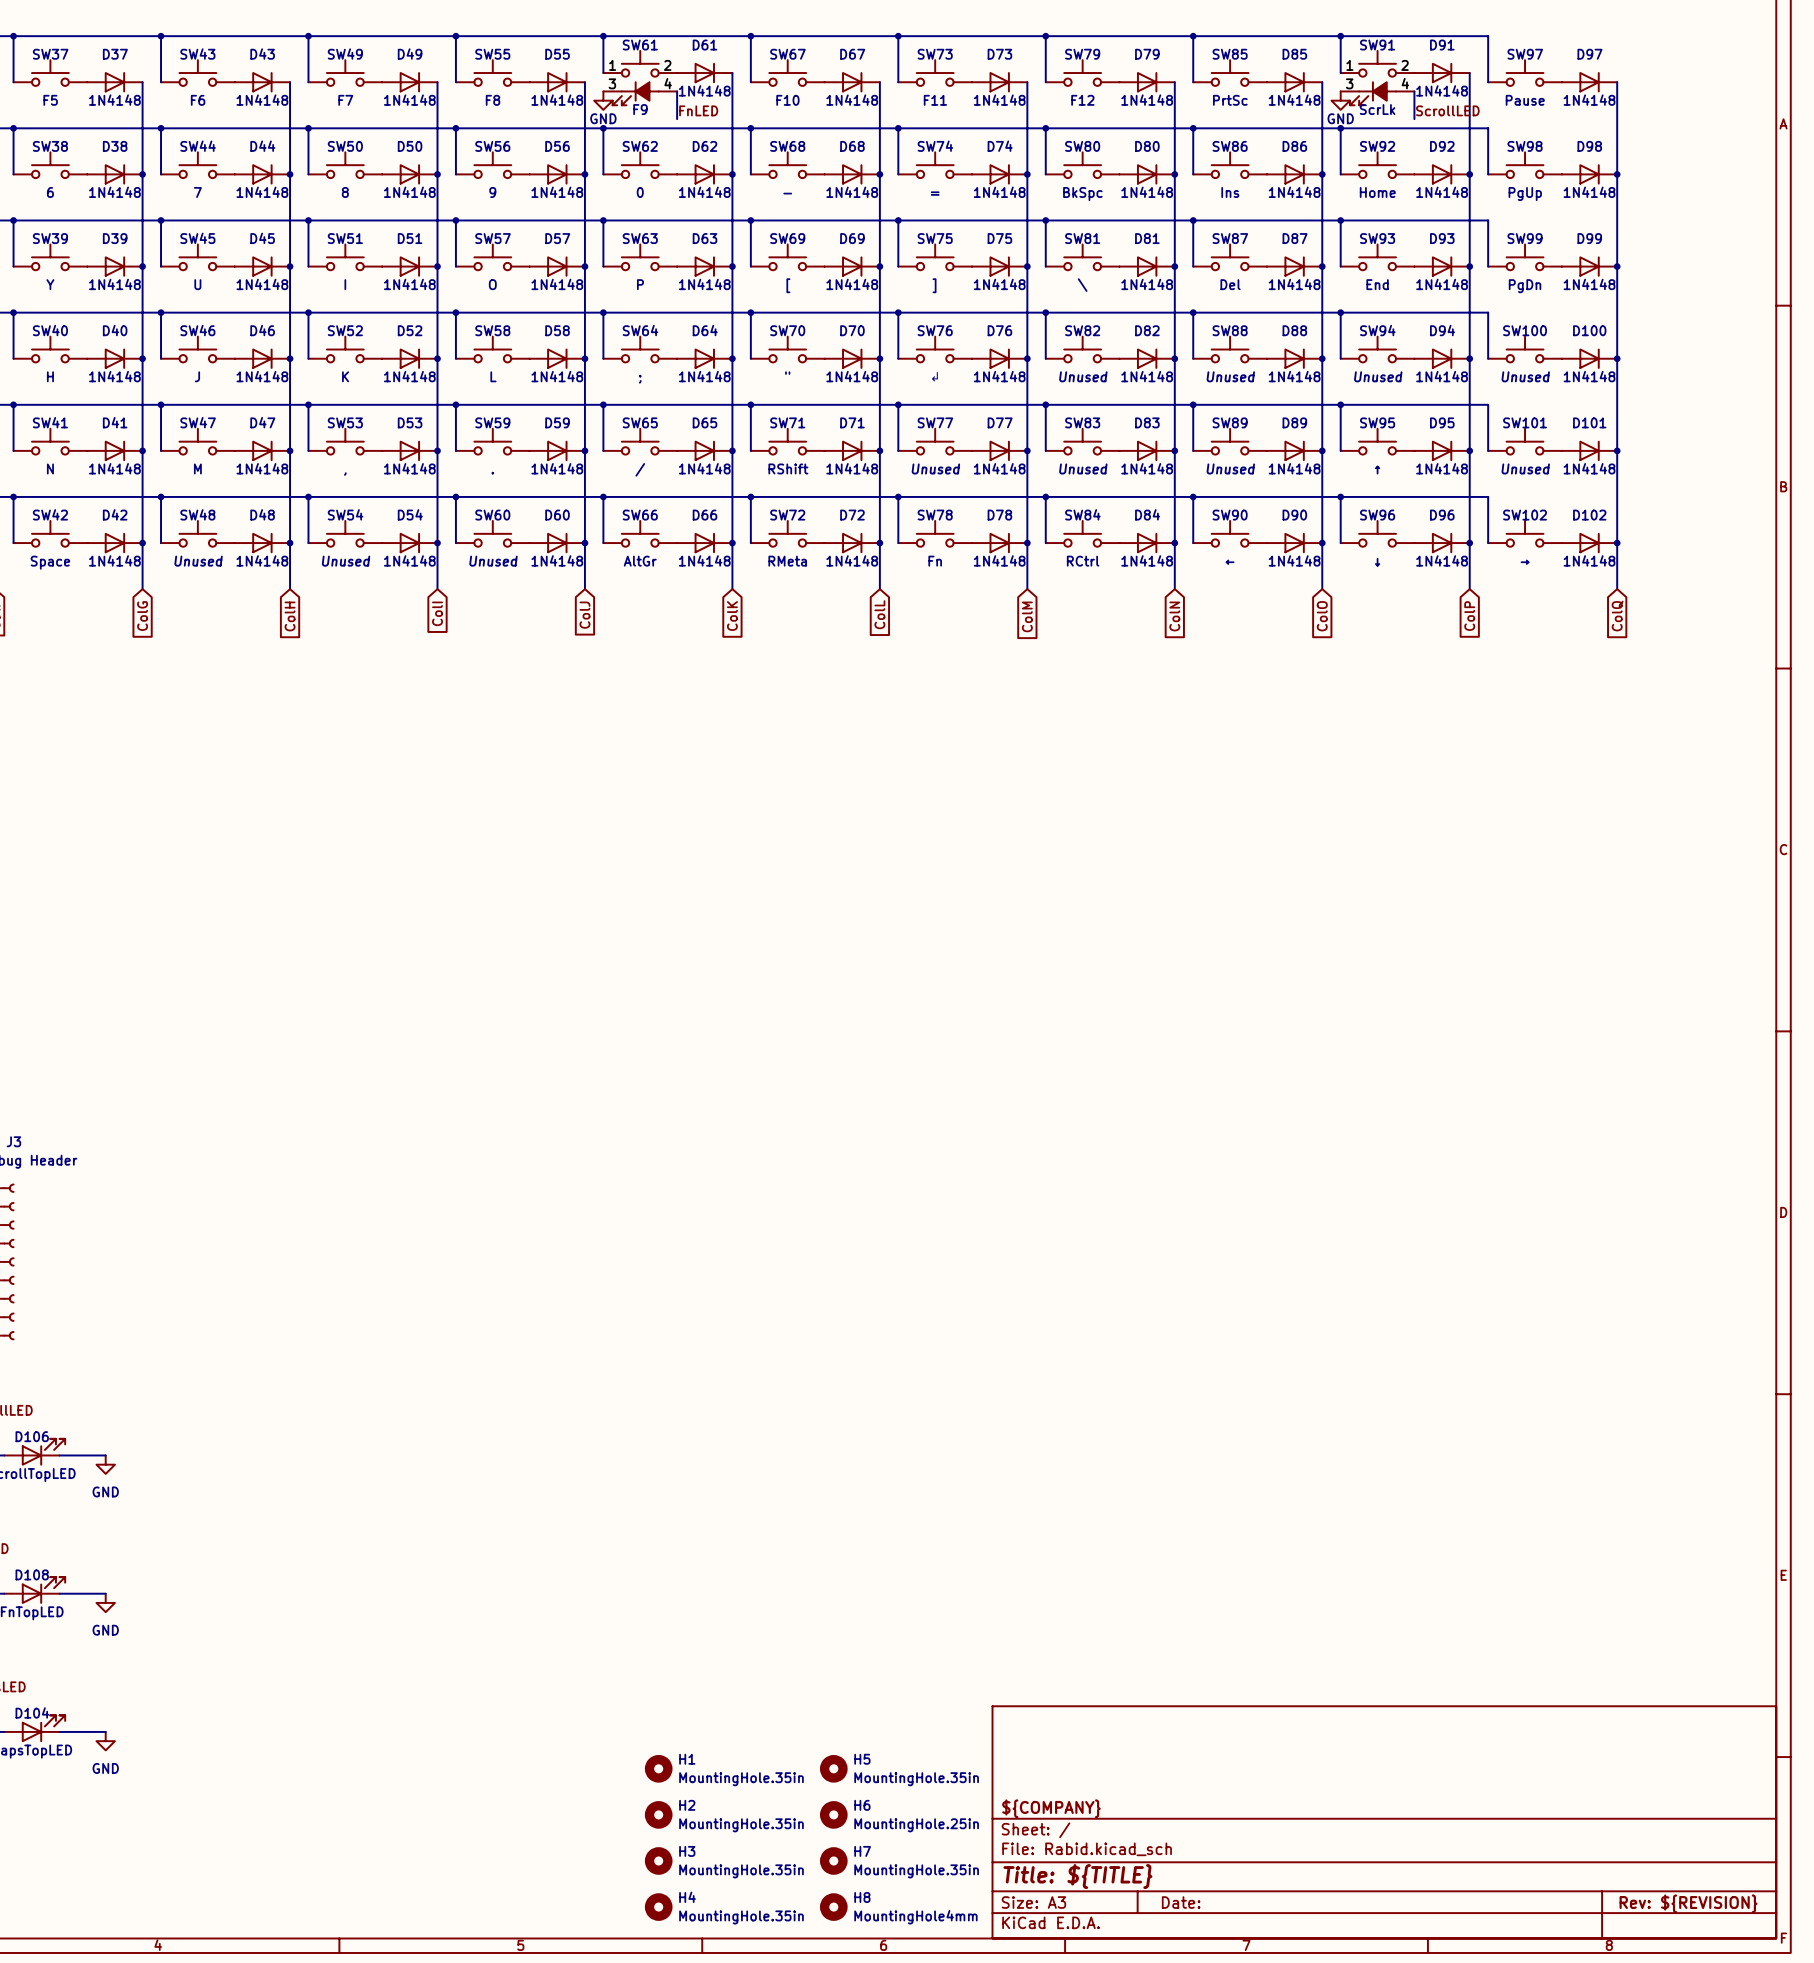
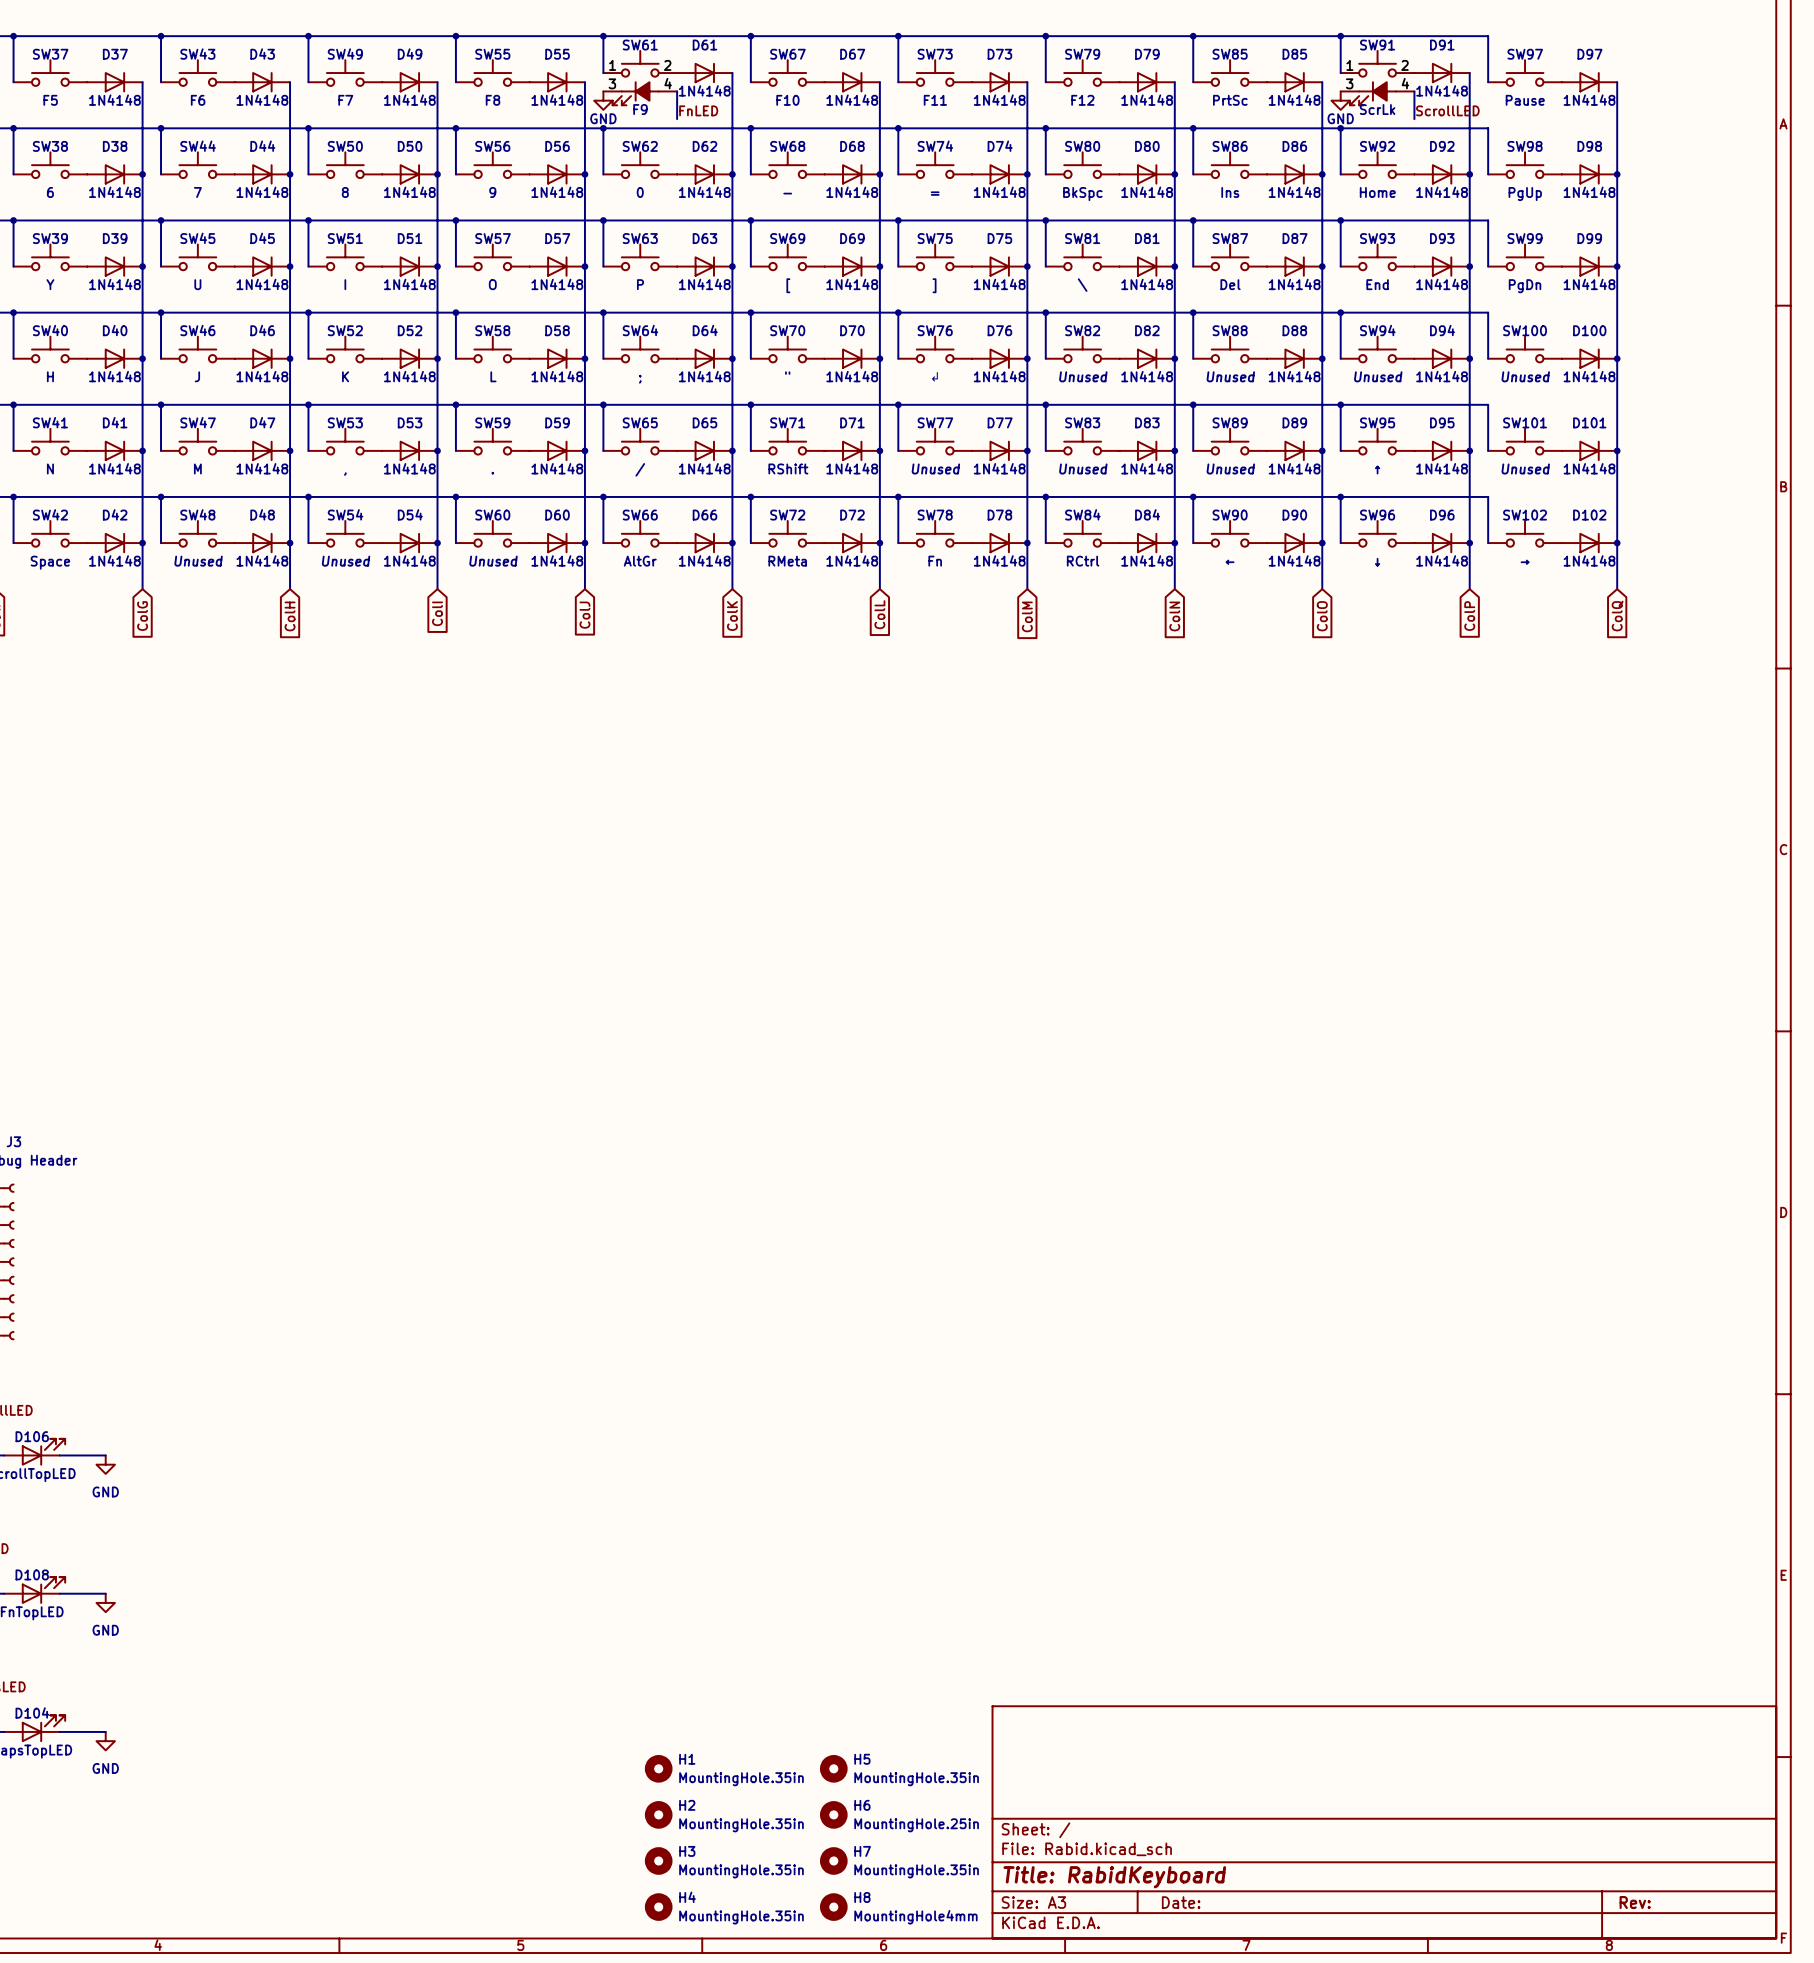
title block: ${COMPANY} (1051, 1808) -> none
title block: Title: ${TITLE} (1077, 1876) -> Title: RabidKeyboard (1114, 1877)
title block: Rev: ${REVISION} (1688, 1903) -> Rev: (1635, 1902)

